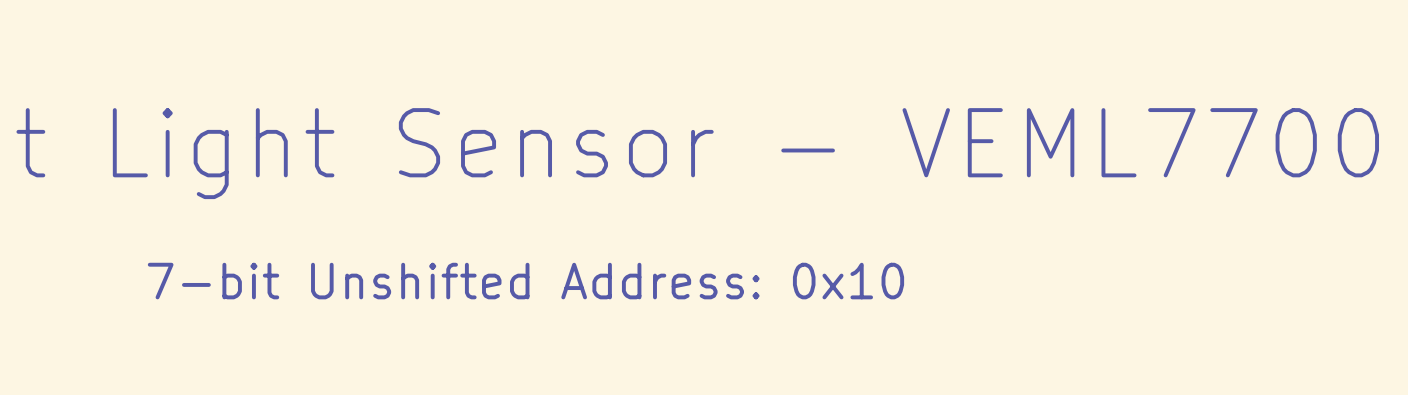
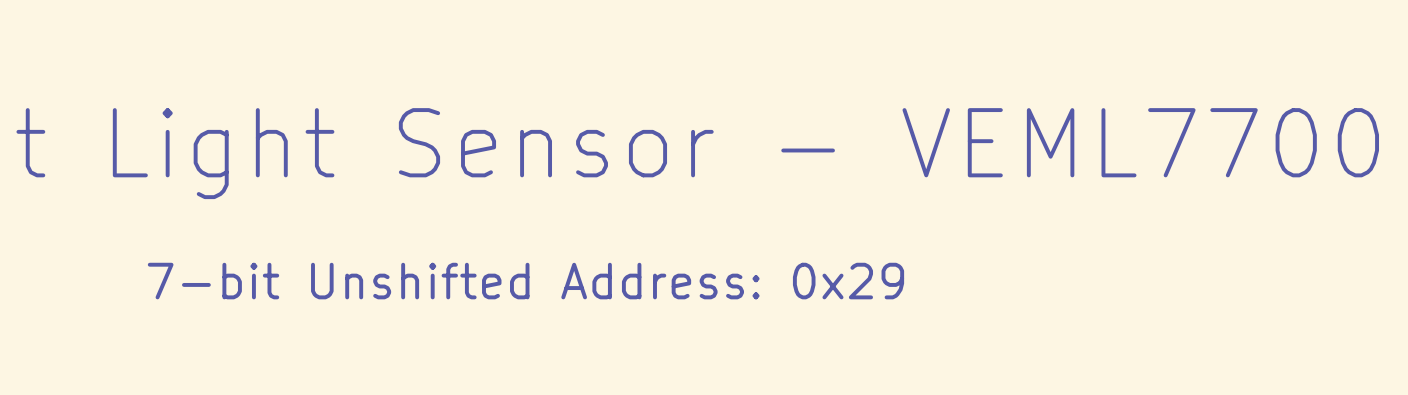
text: 7-bit Unshifted Address: 0x10 (525, 281) -> 7-bit Unshifted Address: 0x29 (525, 281)

